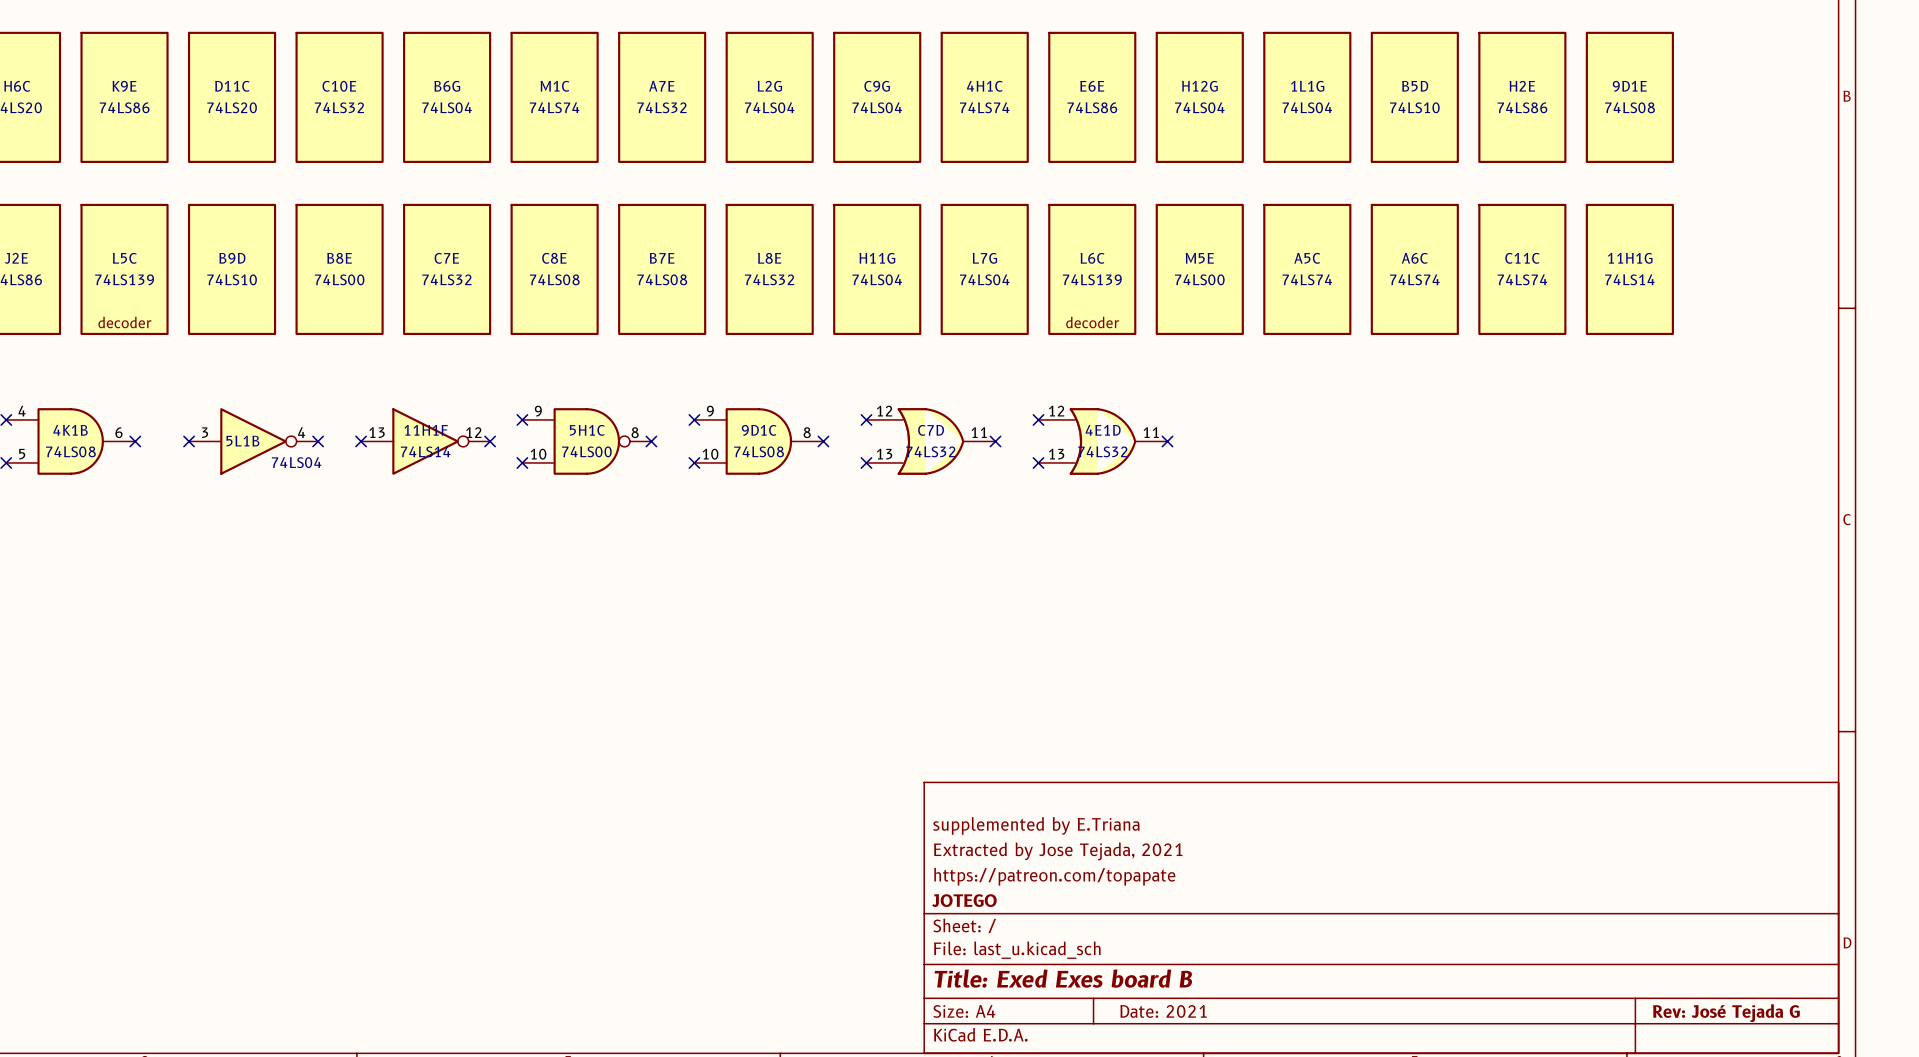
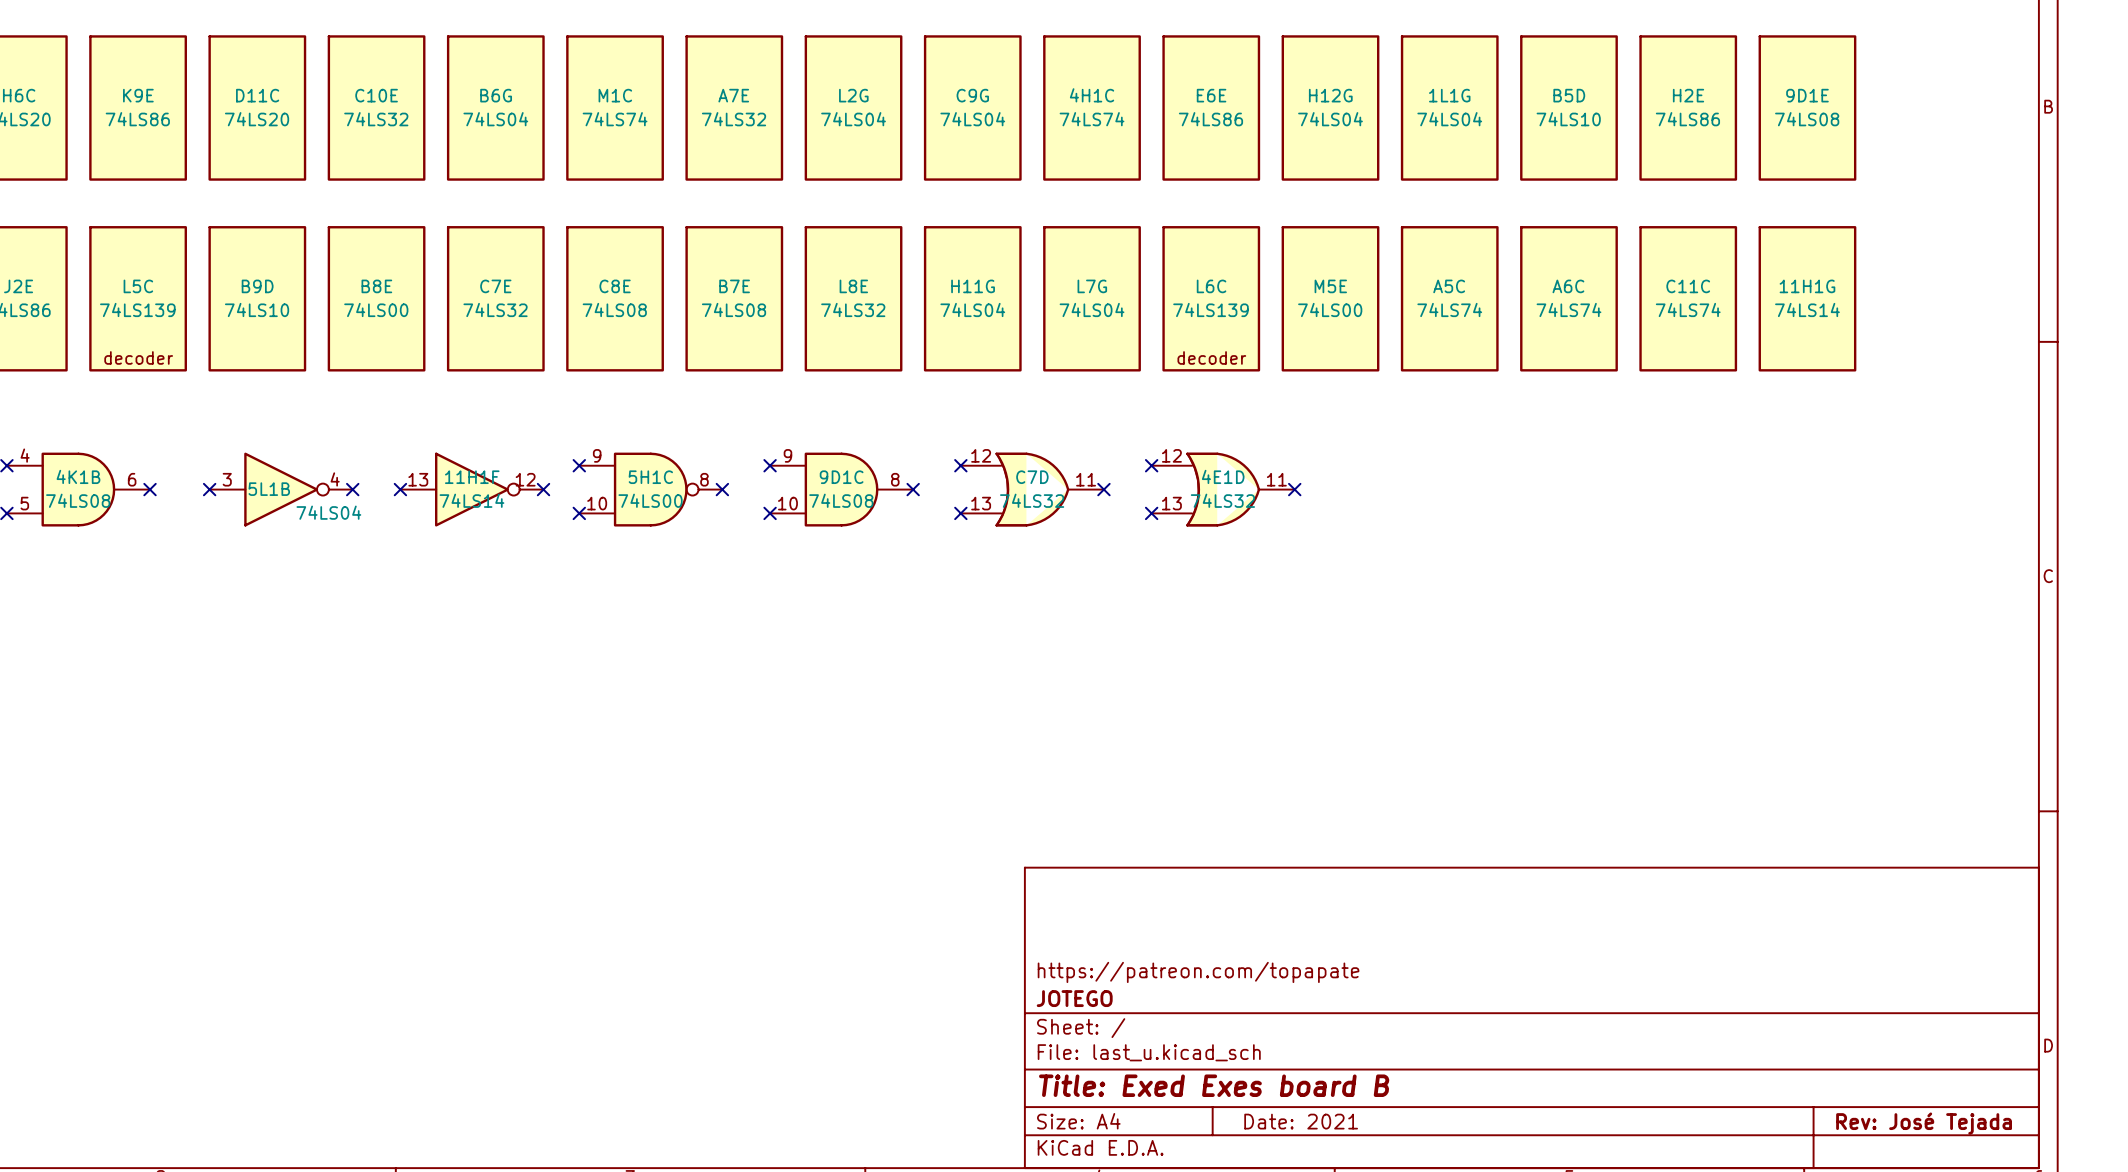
title block: supplemented by E.Triana (1036, 825) -> none
title block: Extracted by Jose Tejada, 2021 (1058, 851) -> none
title block: Rev: José Tejada G (1726, 1013) -> Rev: José Tejada (1924, 1123)

